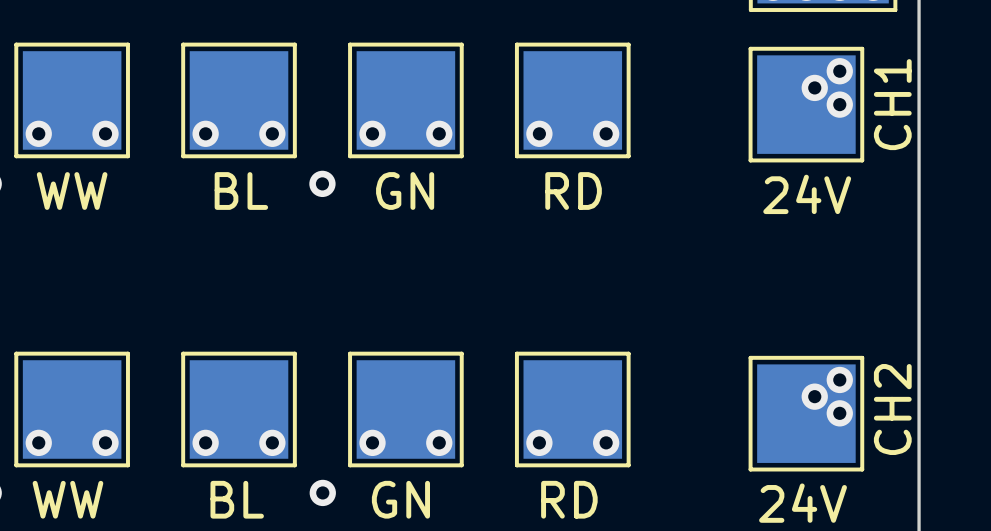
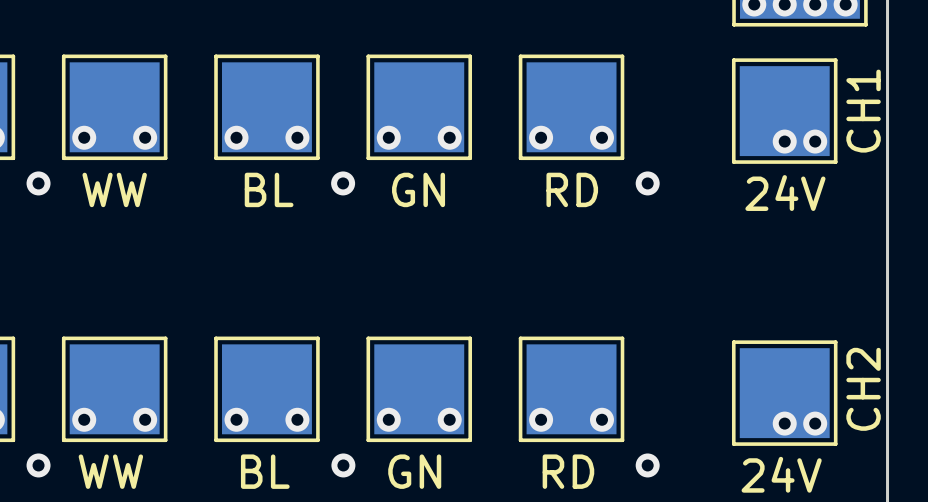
via: (839, 71) -> none
via: (814, 87) -> none
via: (839, 104) -> none
via: none -> (784, 141)
via: none -> (815, 141)
via: none -> (647, 183)
via: (839, 379) -> none
via: (814, 396) -> none
via: (839, 413) -> none
via: none -> (784, 423)
via: none -> (815, 423)
via: none -> (647, 465)

